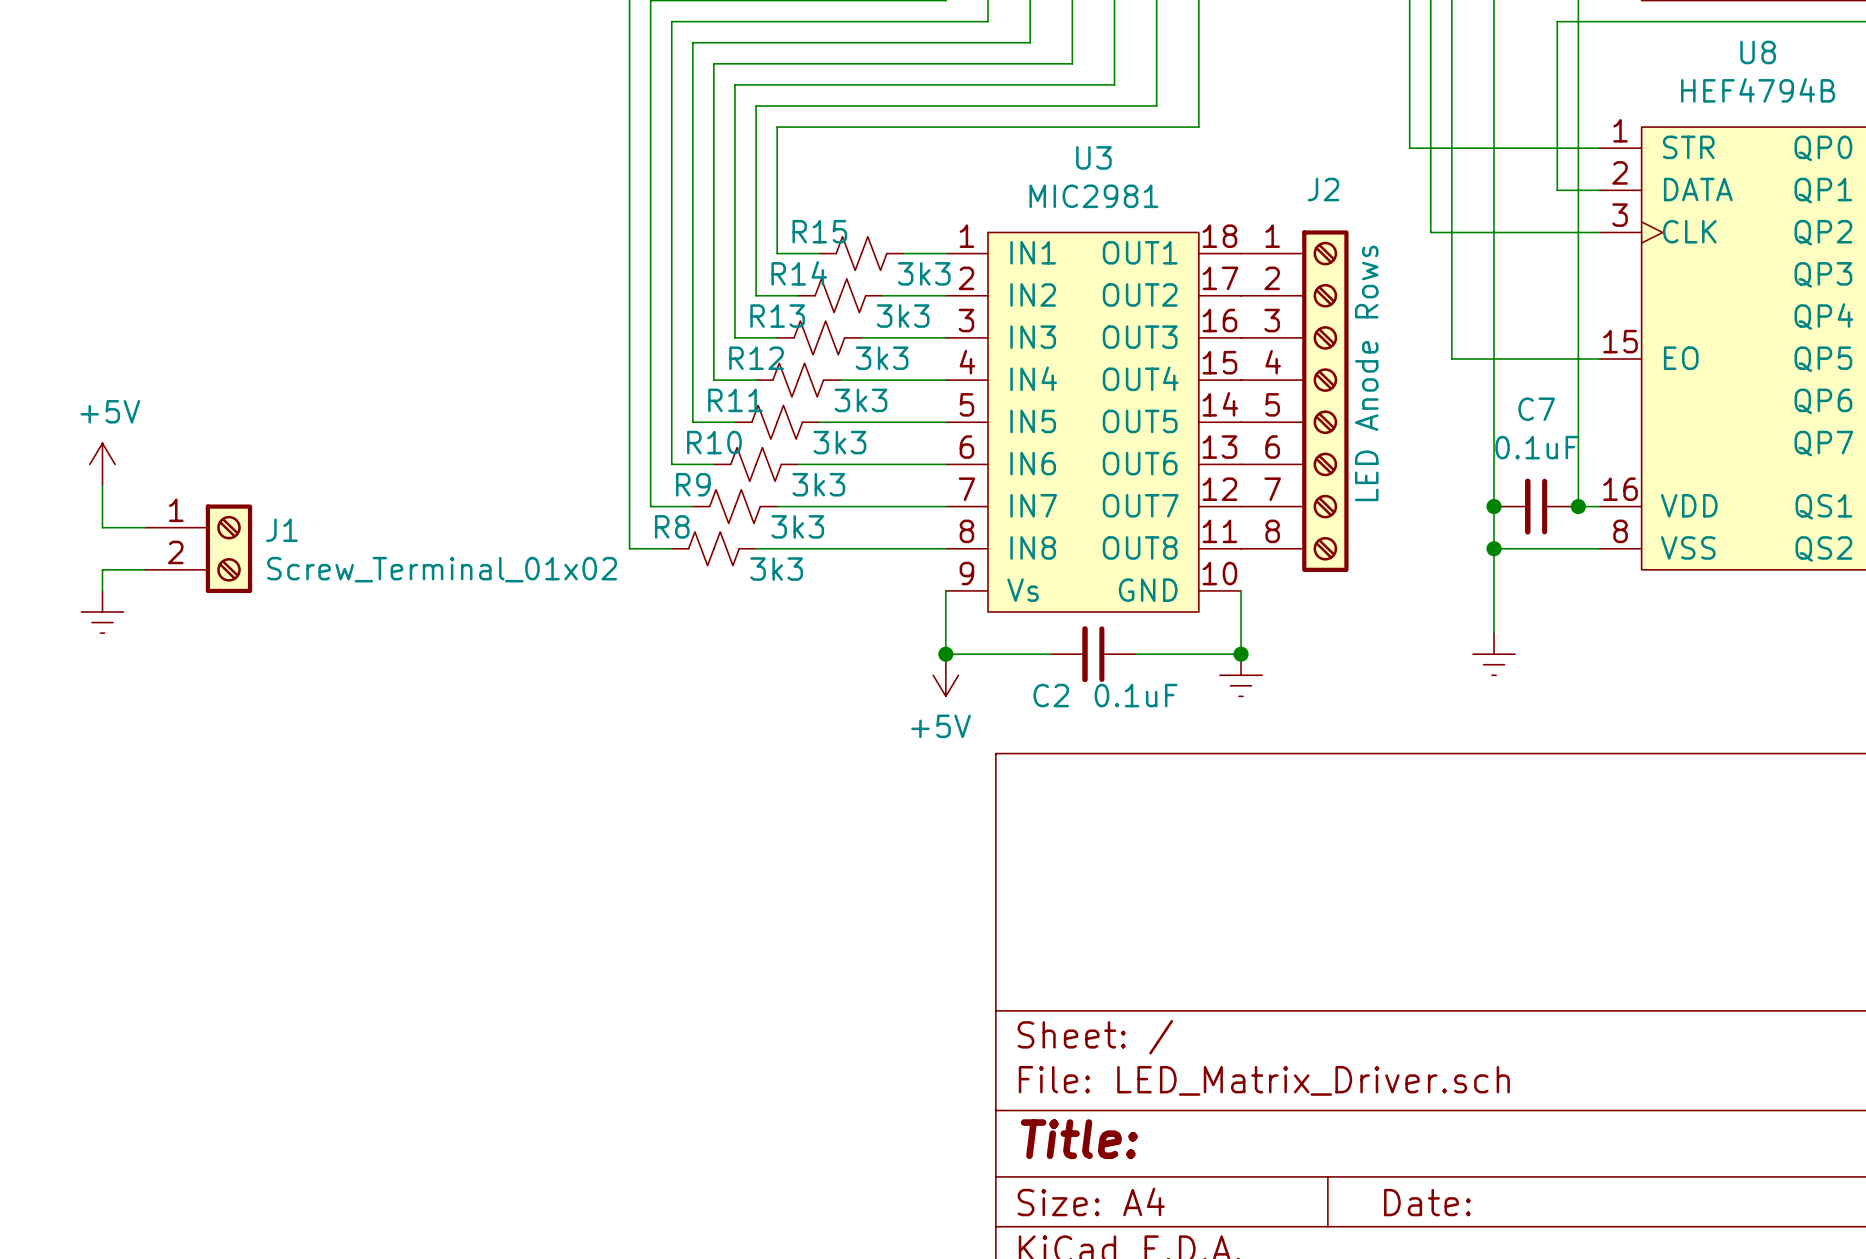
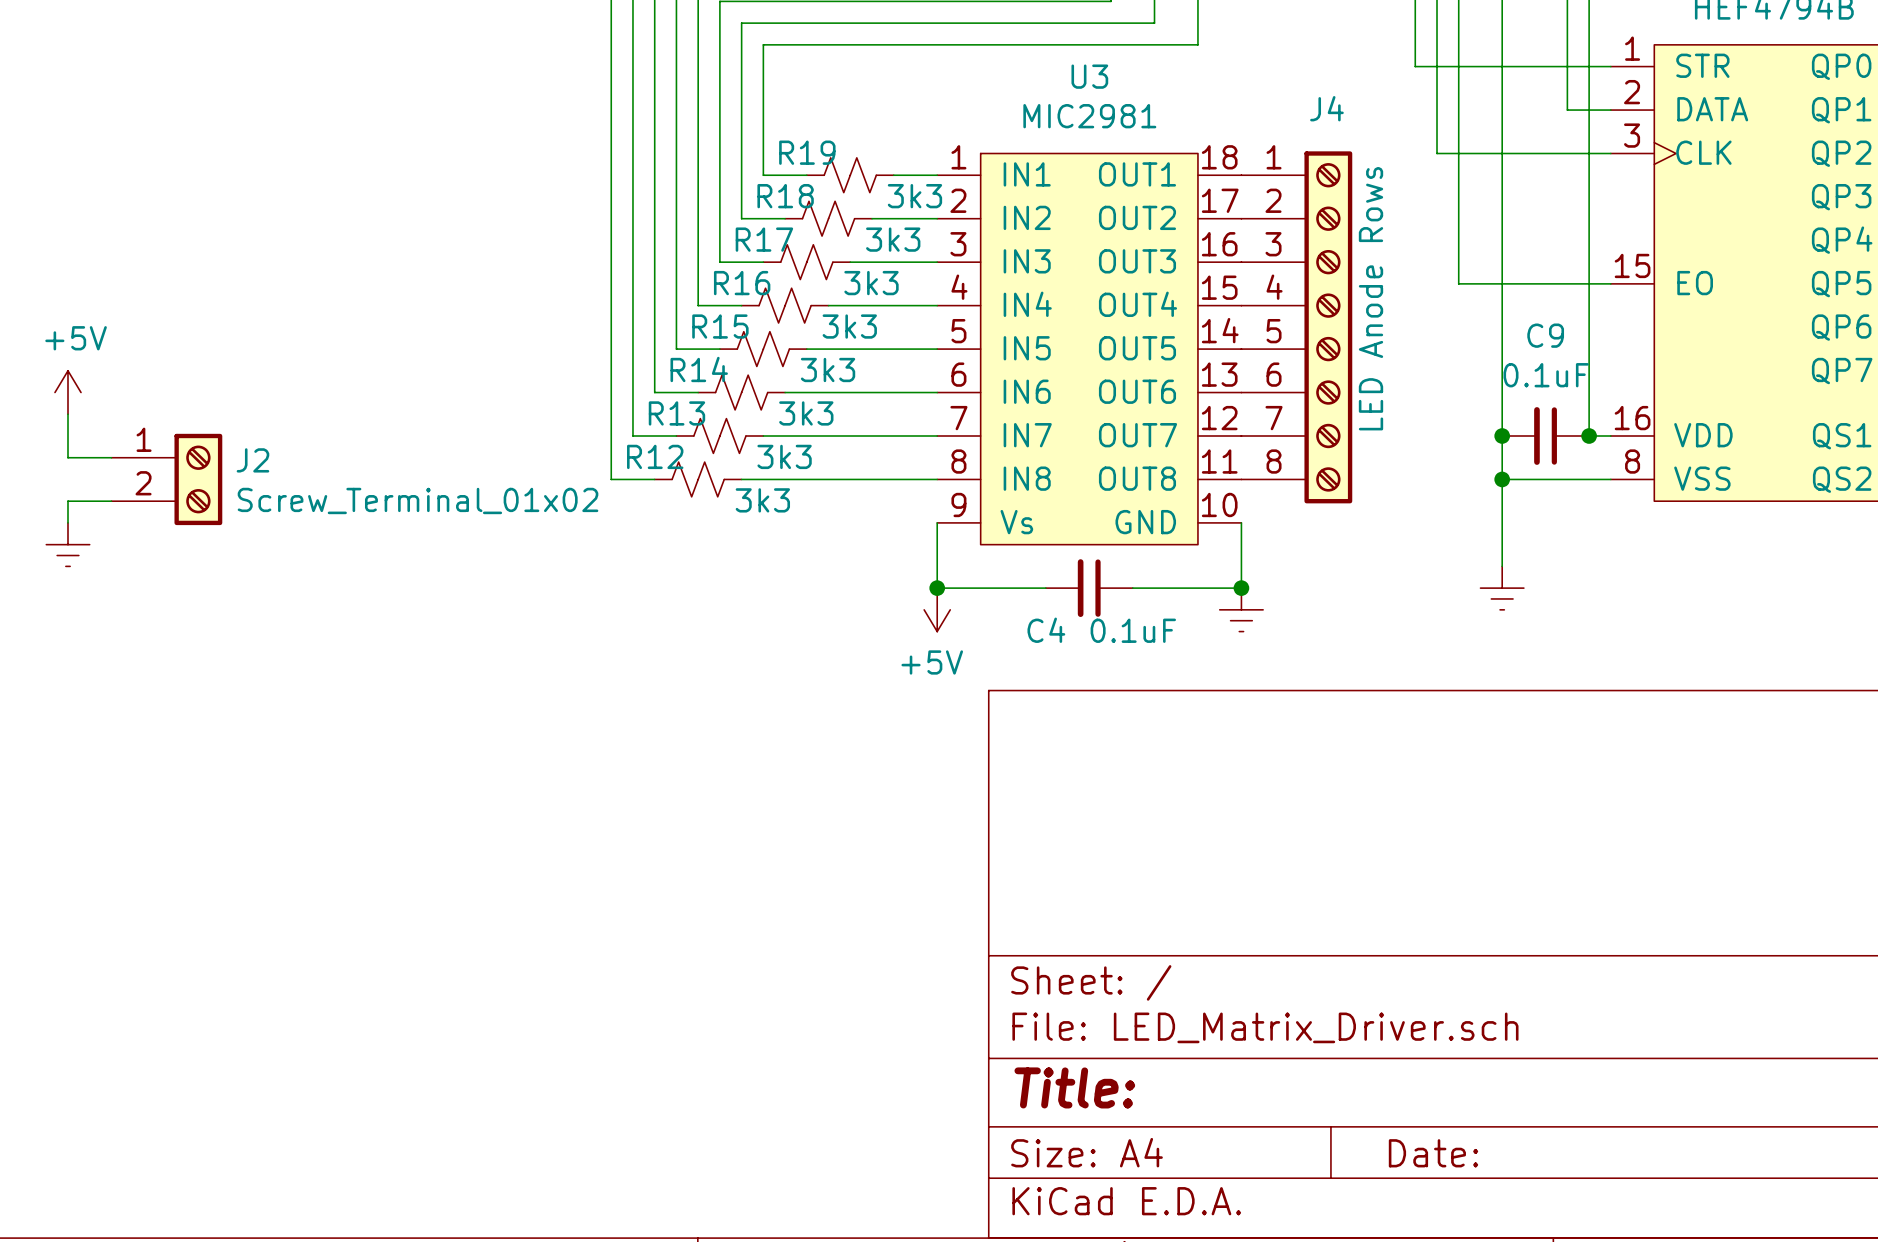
J2 name: J2 (1323, 189) -> J4 (1326, 108)
R15 name: R15 (819, 231) -> R19 (807, 152)
R14 name: R14 (799, 273) -> R18 (785, 196)
R13 name: R13 (777, 316) -> R17 (764, 239)
R12 name: R12 (756, 358) -> R16 (742, 283)
R11 name: R11 (735, 400) -> R15 (720, 326)
C7 name: C7 (1536, 409) -> C9 (1545, 335)
R10 name: R10 (714, 442) -> R14 (699, 369)
R9 name: R9 (693, 484) -> R13 (676, 413)
R8 name: R8 (672, 526) -> R12 (655, 456)
J1 name: J1 (281, 530) -> J2 (252, 460)
C2 name: C2 (1051, 695) -> C4 (1046, 630)

